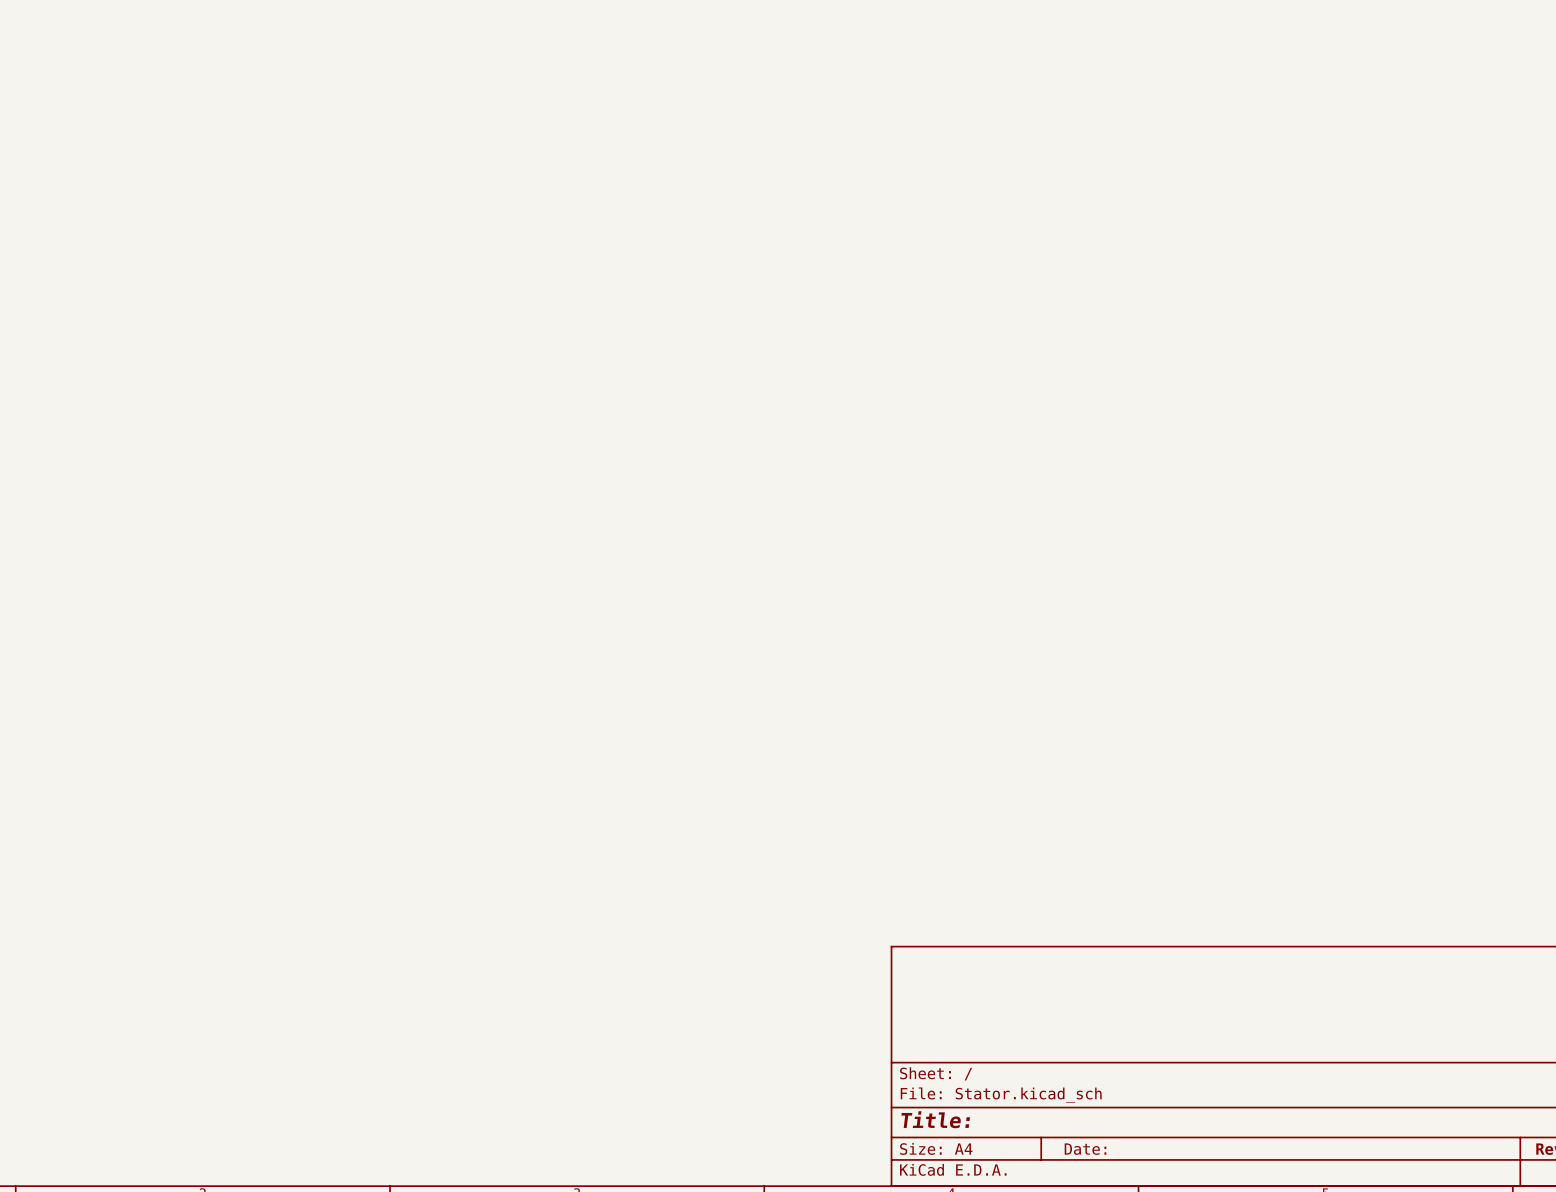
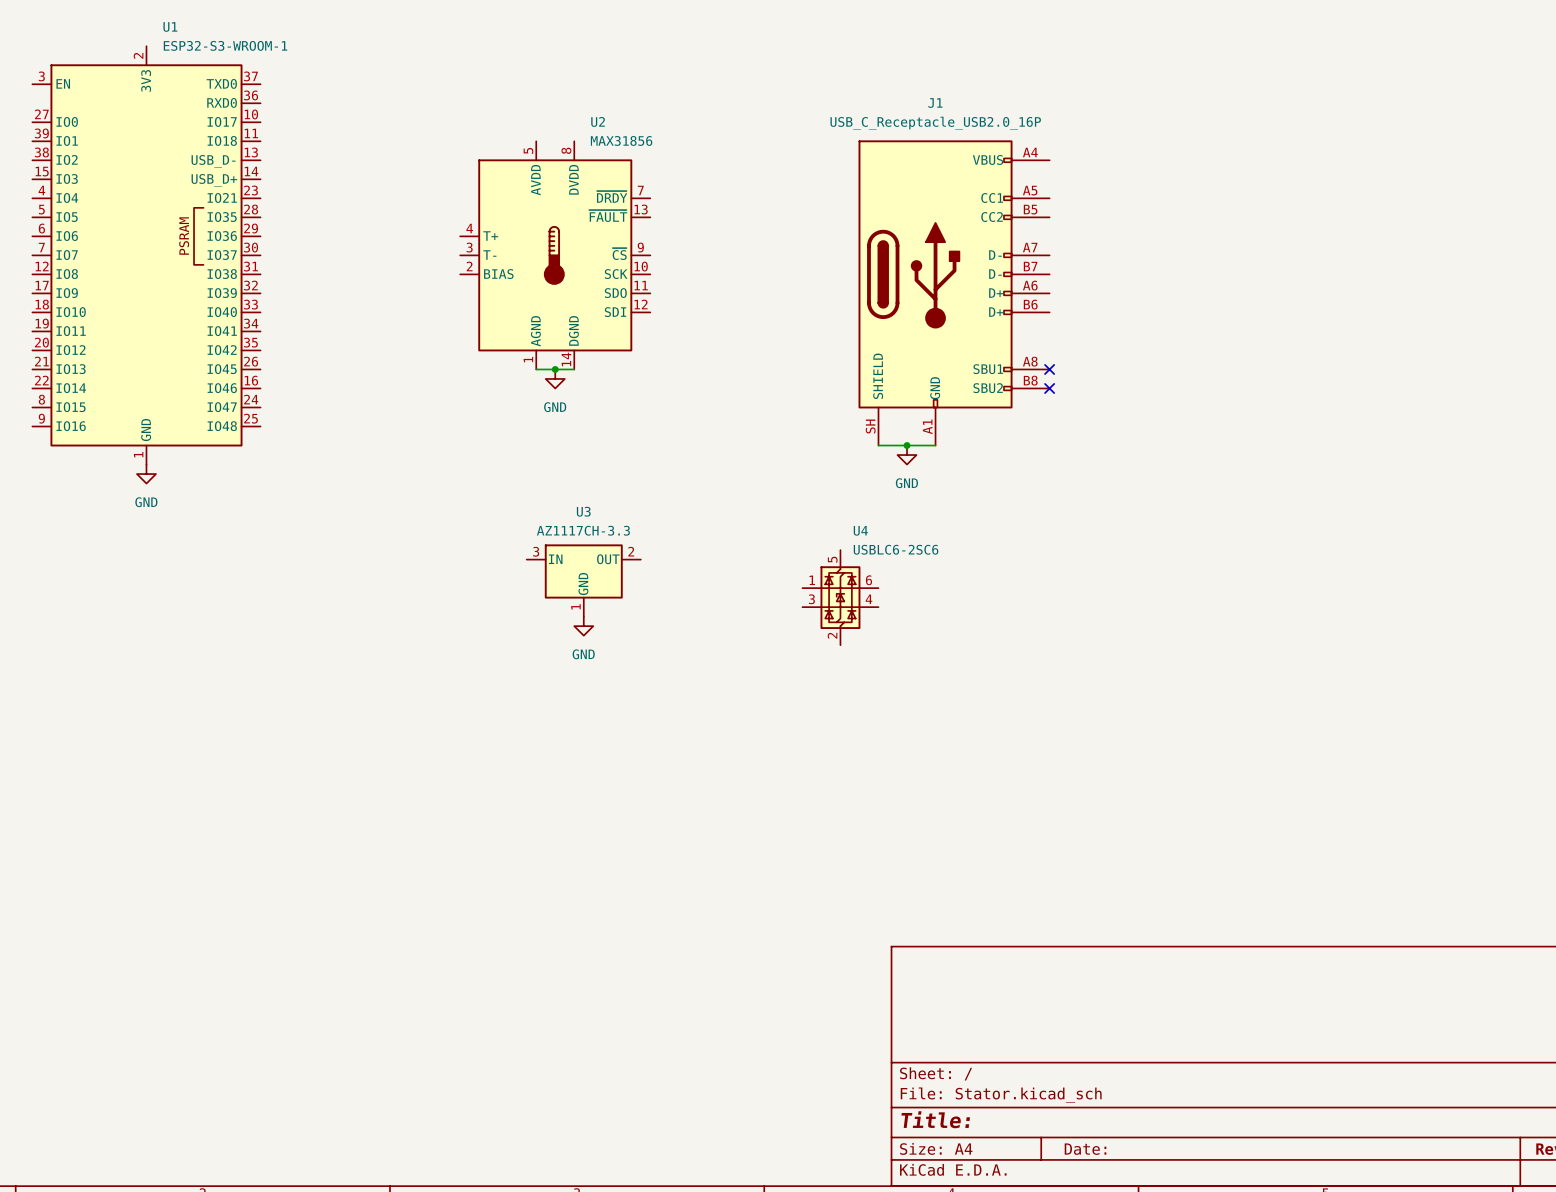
U1: none -> ESP32-S3-WROOM-1 (146, 255)
U2: none -> MAX31856 (555, 255)
J1: none -> USB_C_Receptacle_USB2.0_16P (954, 292)
wire: none -> (536, 369) (574, 369)
junction: none -> (555, 369)
no-connect mark: none -> (1049, 369)
power symbol: none -> GND (555, 378)
no-connect mark: none -> (1049, 388)
wire: none -> (878, 445) (935, 445)
junction: none -> (907, 445)
power symbol: none -> GND (907, 455)
power symbol: none -> GND (146, 474)
U3: none -> AZ1117CH-3.3 (583, 580)
U4: none -> USBLC6-2SC6 (840, 597)
power symbol: none -> GND (583, 626)

